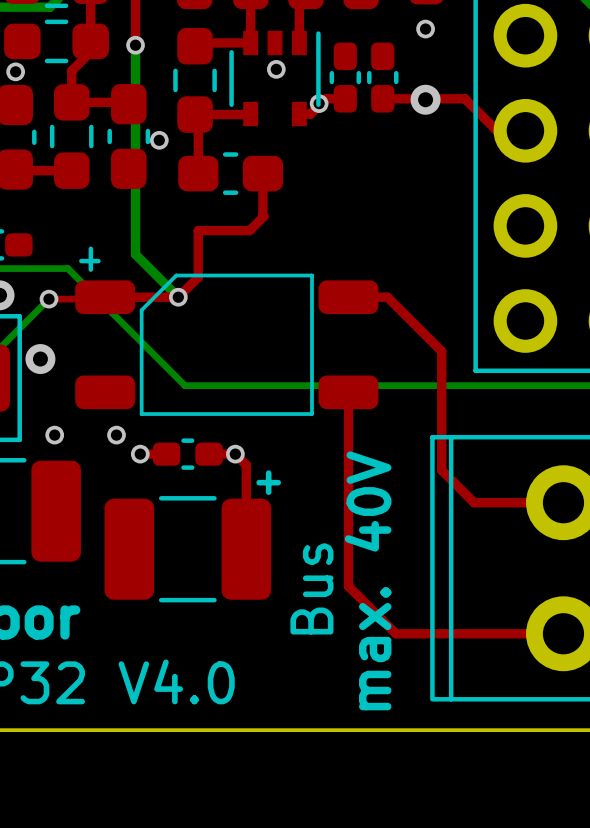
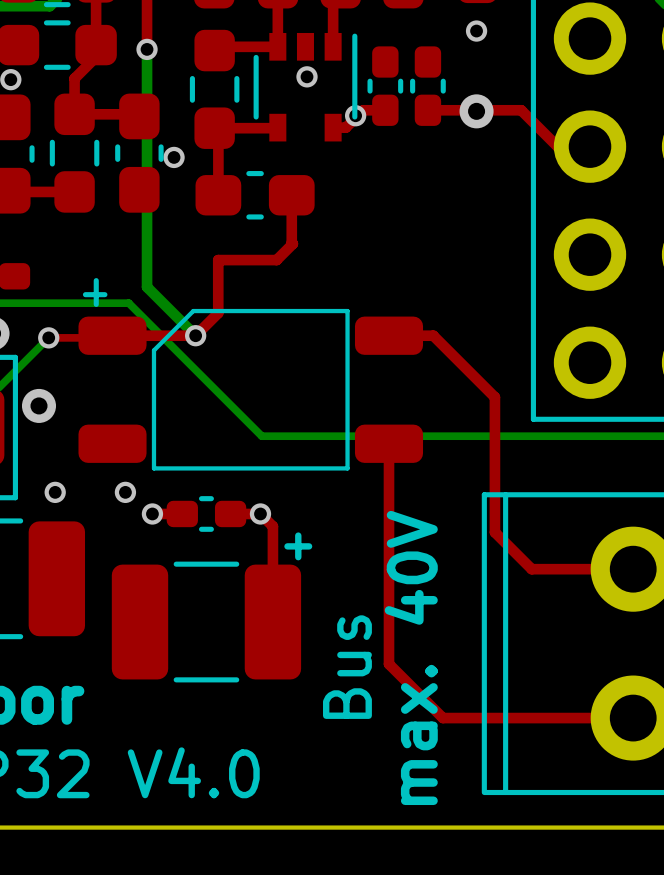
bottom track: (67, 268) (184, 385) (236, 385) -> (70, 303) (128, 303) (261, 436)

